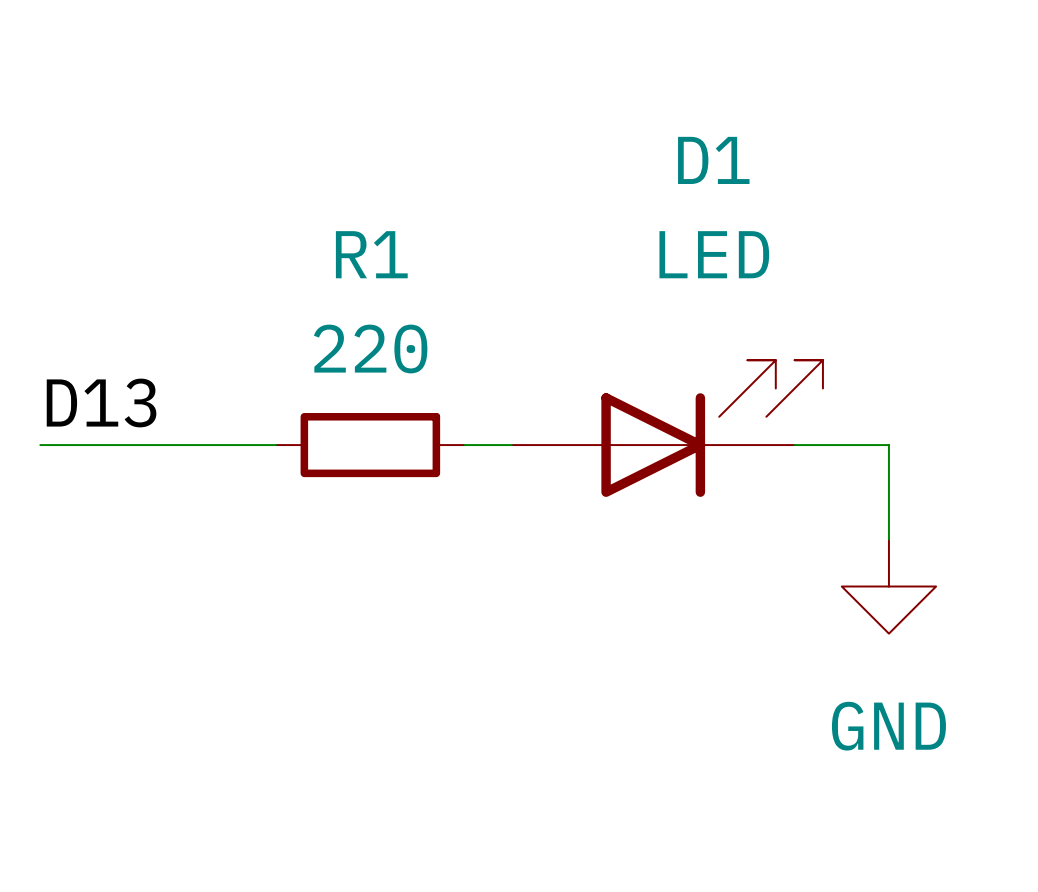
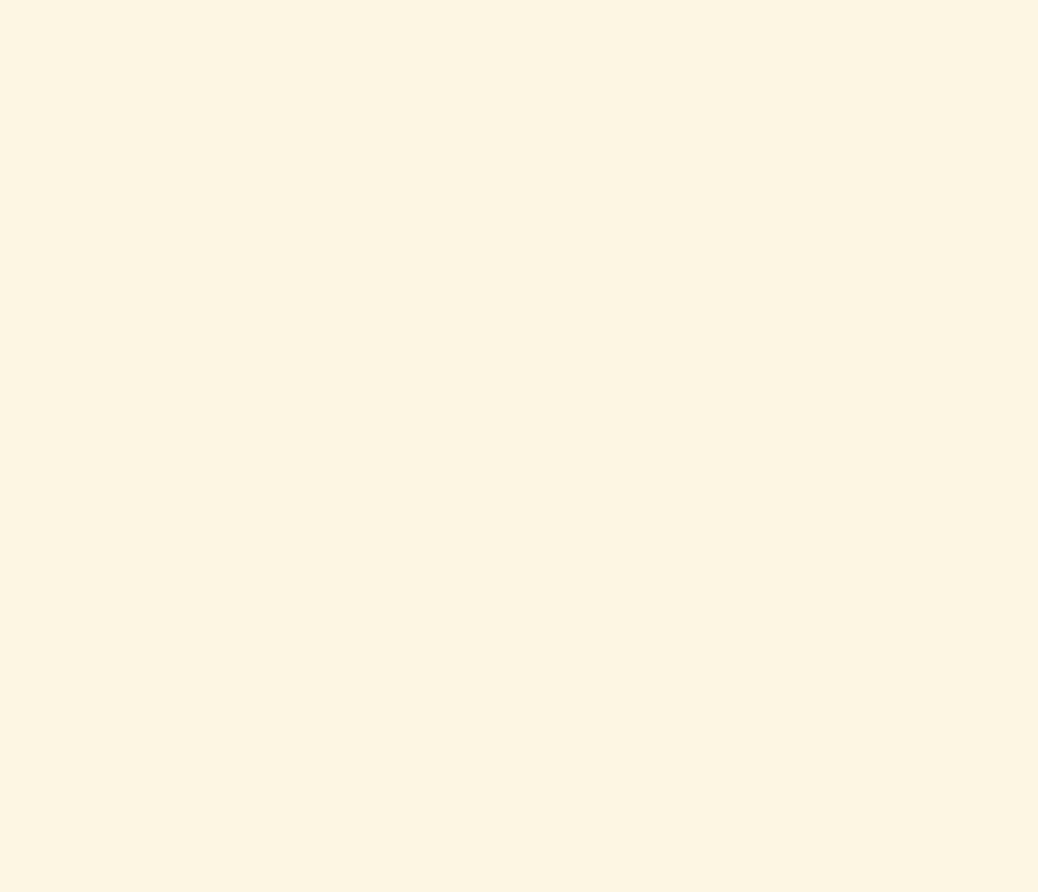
label: D13 (101, 402) -> none
D1: LED (667, 428) -> none
wire: (40, 445) (276, 445) -> none
R1: 220 (370, 445) -> none
wire: (464, 445) (511, 445) -> none
wire: (794, 445) (888, 445) (888, 539) -> none
power symbol: GND (888, 586) -> none

